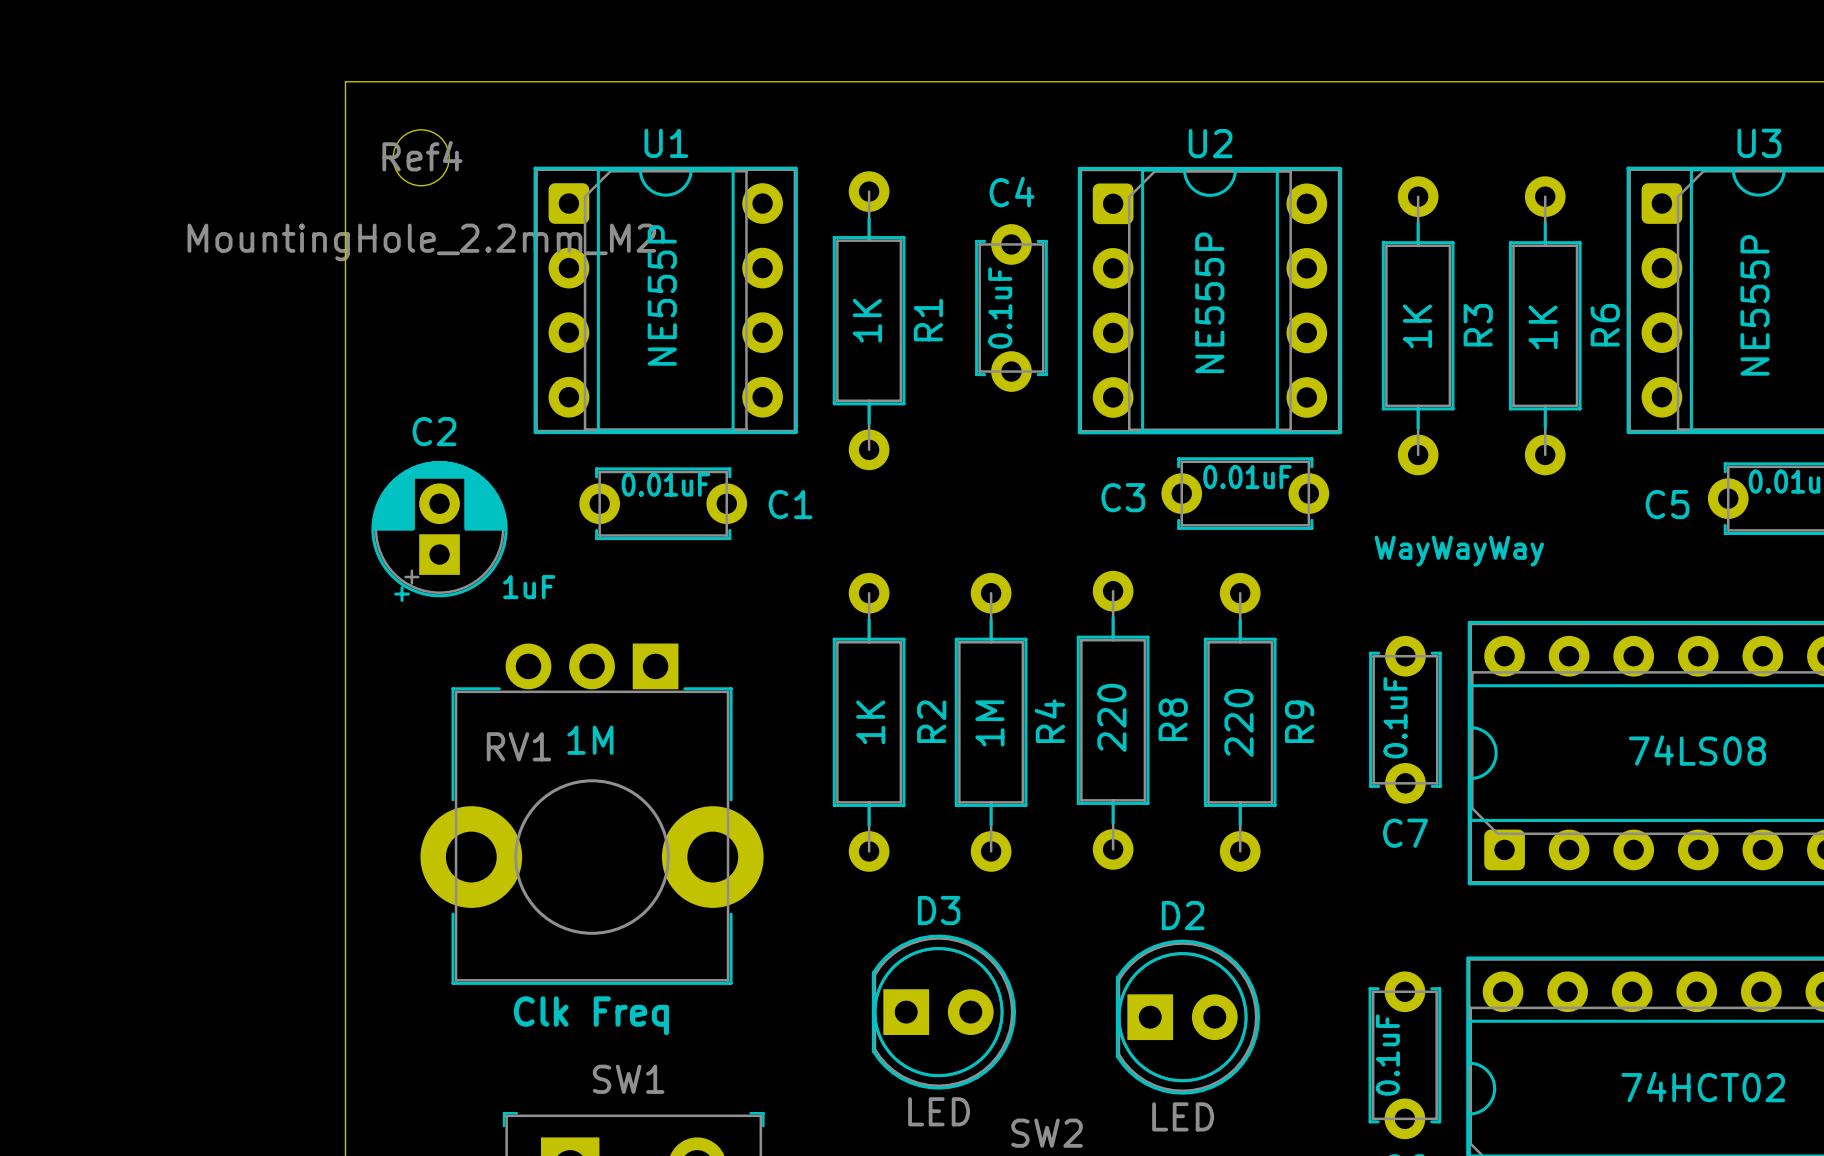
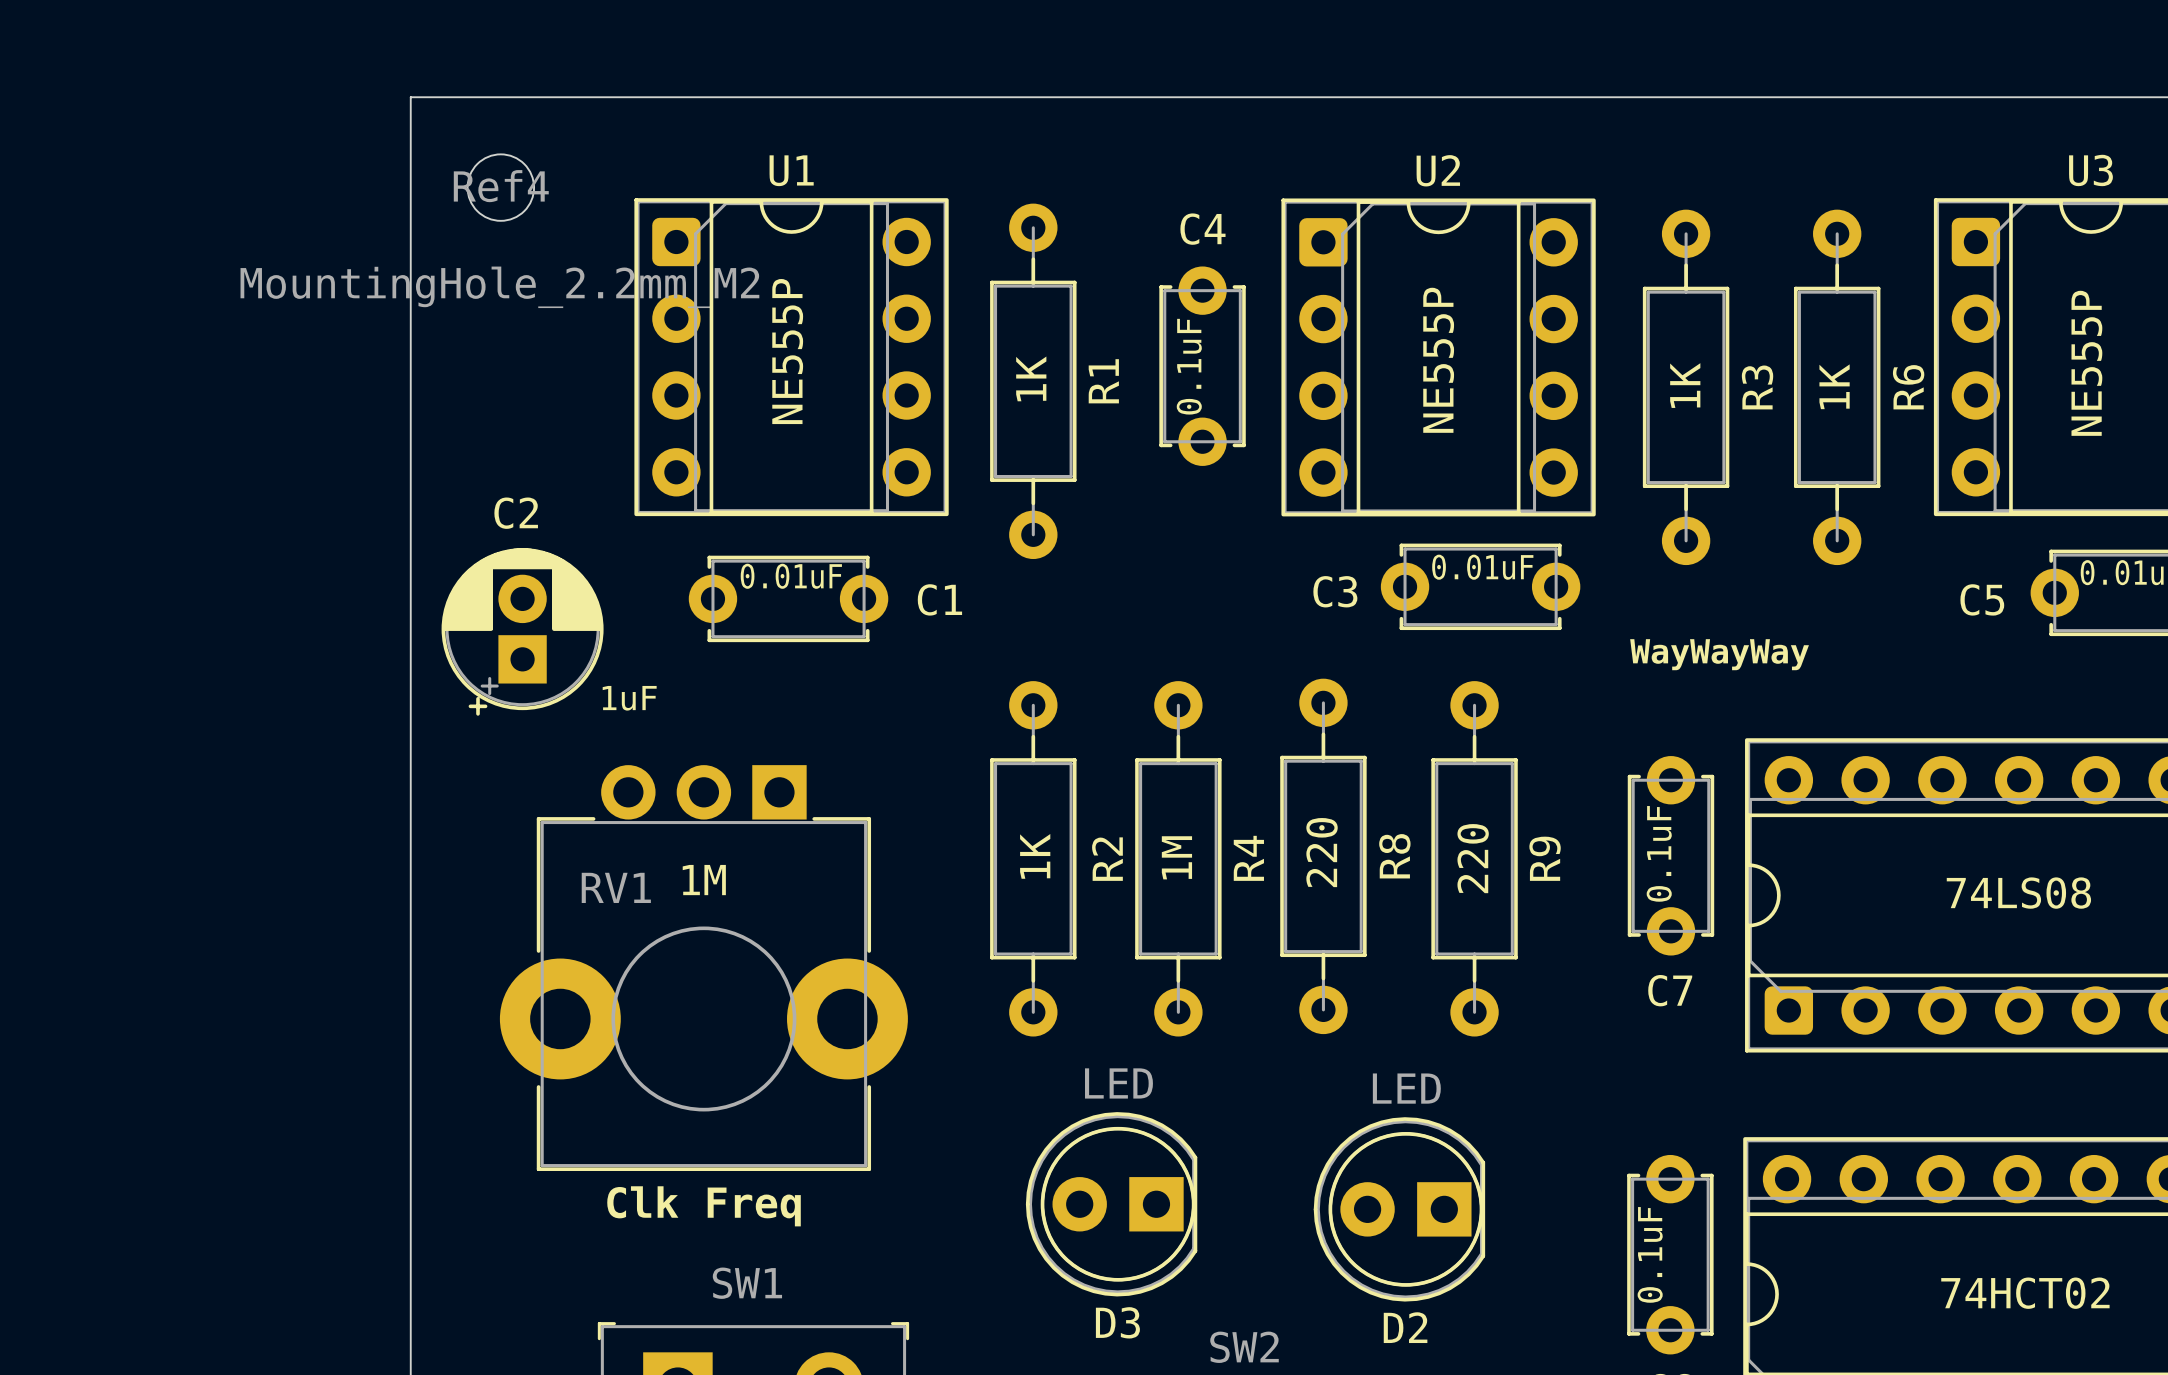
D3 rotation: 0° (943, 1012) -> 180° (1111, 1204)
D2 rotation: 0° (1187, 1017) -> 180° (1399, 1209)

